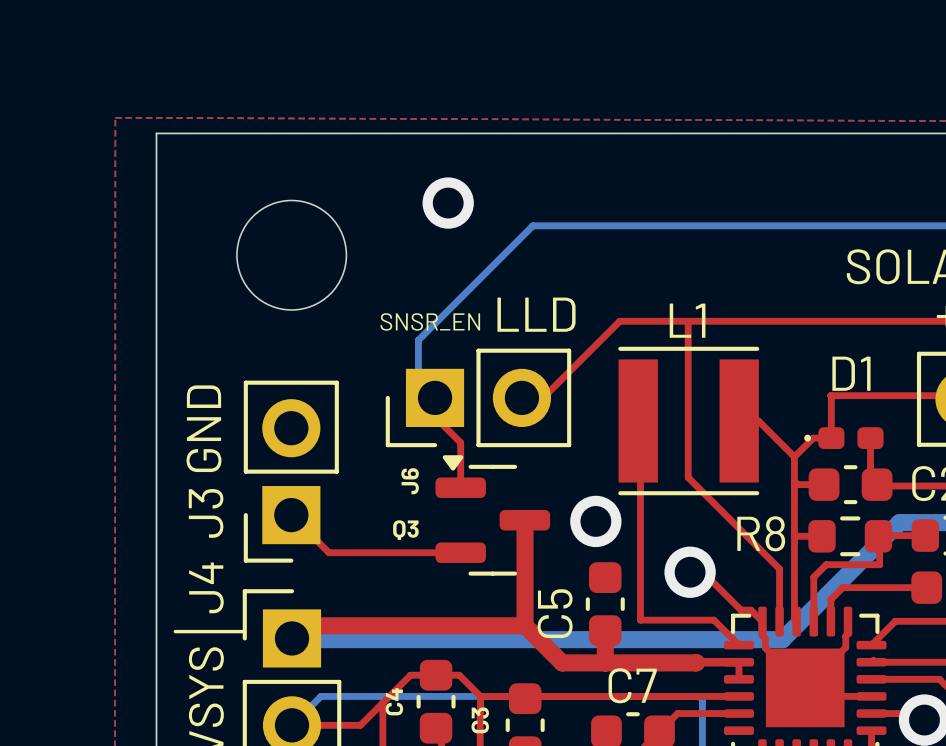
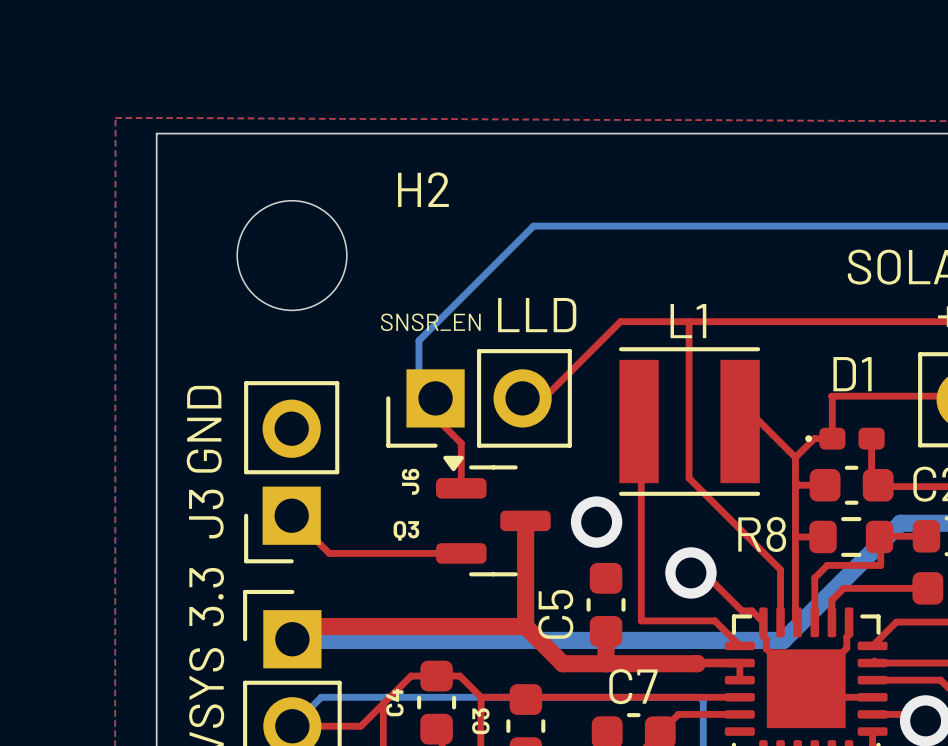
H2 name: none -> H2 (423, 189)
via: (448, 203) -> none
J4 name: J4 (206, 587) -> 3.3 (206, 597)
line: (175, 631) (243, 631) -> none

